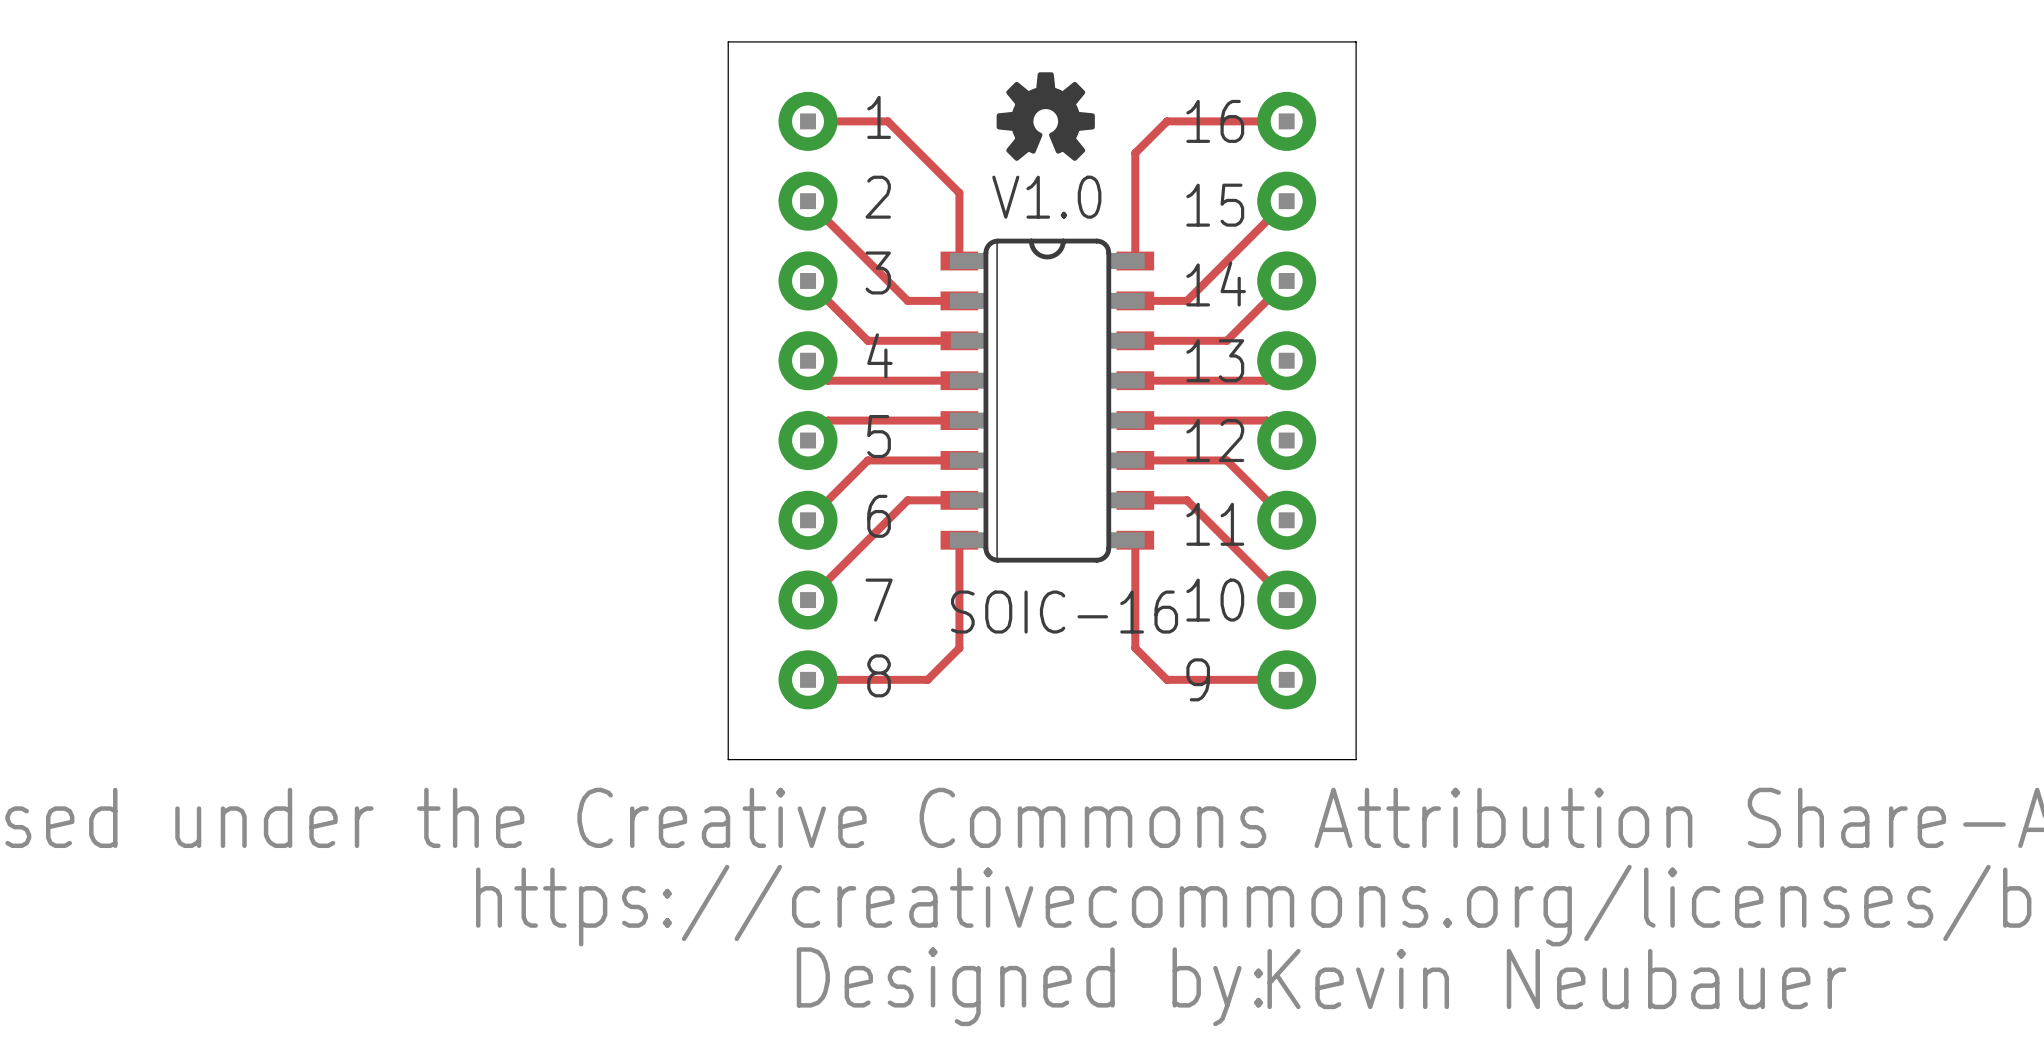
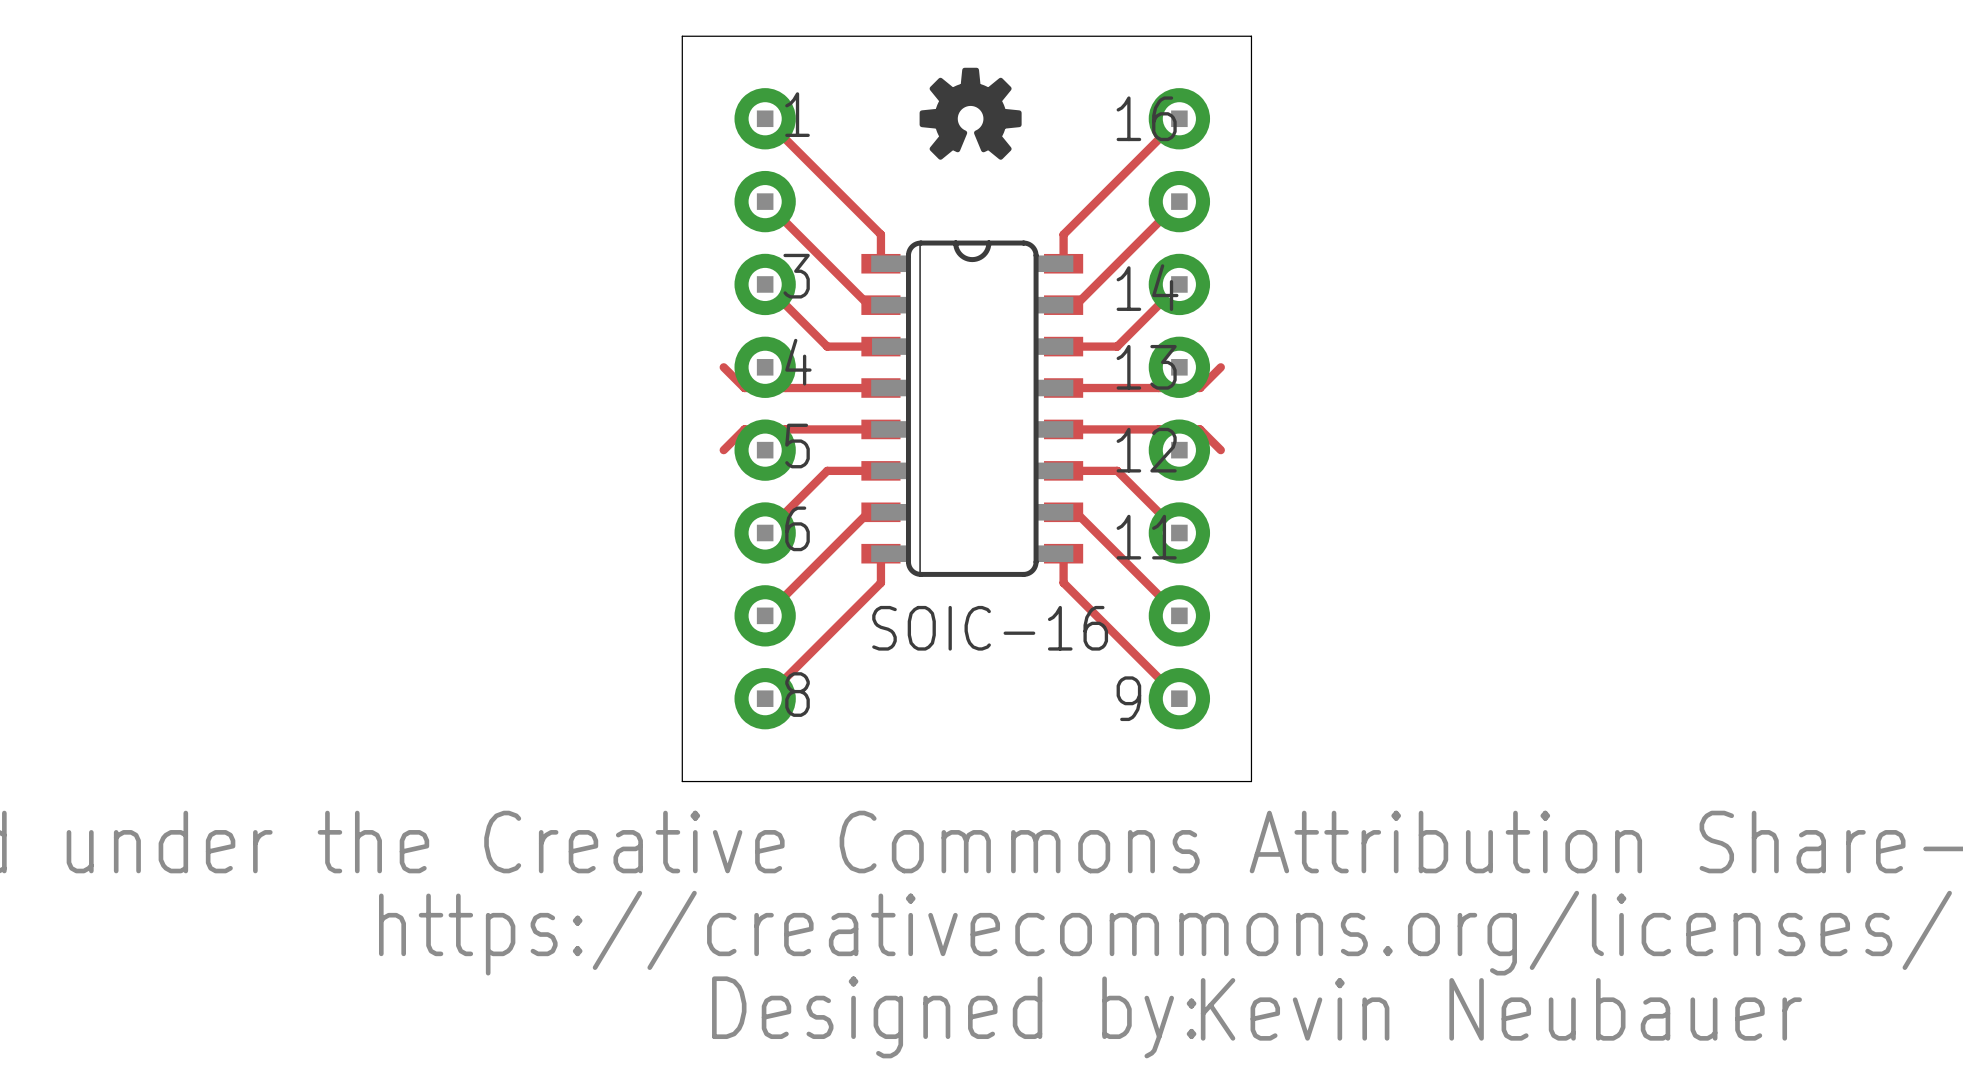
board edge: (768, 41) (728, 41) (728, 759) (768, 759) -> (682, 36) (682, 781)
board edge: (1316, 41) (1356, 41) (1356, 759) (1316, 759) -> (1251, 36) (1251, 781)
track: (808, 121) (887, 121) (959, 193) (959, 232) -> (765, 118) (880, 234)
track: (1286, 121) (1167, 121) (1135, 153) (1135, 232) -> (1179, 118) (1063, 234)
text: 2 (878, 197) -> none
text: V1.0 (1046, 197) -> none
track: (808, 201) (907, 300) (947, 300) -> (765, 201) (868, 305)
track: (1286, 201) (1186, 300) (1147, 300) -> (1179, 201) (1075, 305)
text: 15 (1215, 205) -> none
track: (808, 280) (867, 340) (907, 340) -> (765, 284) (827, 346)
track: (1286, 280) (1226, 340) (1186, 340) -> (1179, 284) (1117, 346)
part position: (808, 400) -> (765, 408)
part position: (1286, 400) -> (1179, 408)
track: (907, 460) (867, 460) (808, 520) -> (827, 470) (765, 532)
track: (1186, 460) (1226, 460) (1286, 520) -> (1117, 470) (1179, 532)
track: (947, 500) (907, 500) (808, 600) -> (868, 512) (765, 615)
track: (1147, 500) (1186, 500) (1286, 600) -> (1075, 512) (1179, 615)
track: (959, 568) (959, 648) (927, 679) (808, 679) -> (880, 582) (765, 698)
track: (1135, 568) (1135, 648) (1167, 679) (1286, 679) -> (1063, 582) (1179, 698)
text: 7 (879, 600) -> none
text: 10 (1215, 600) -> none

